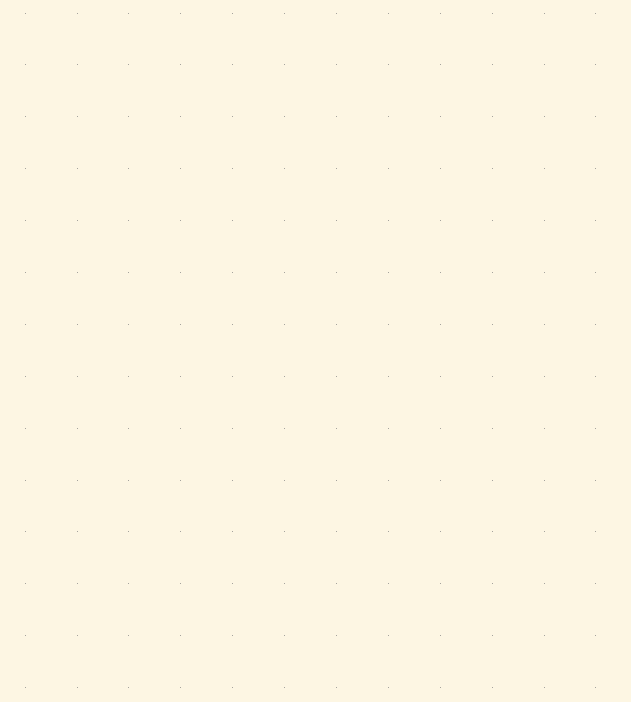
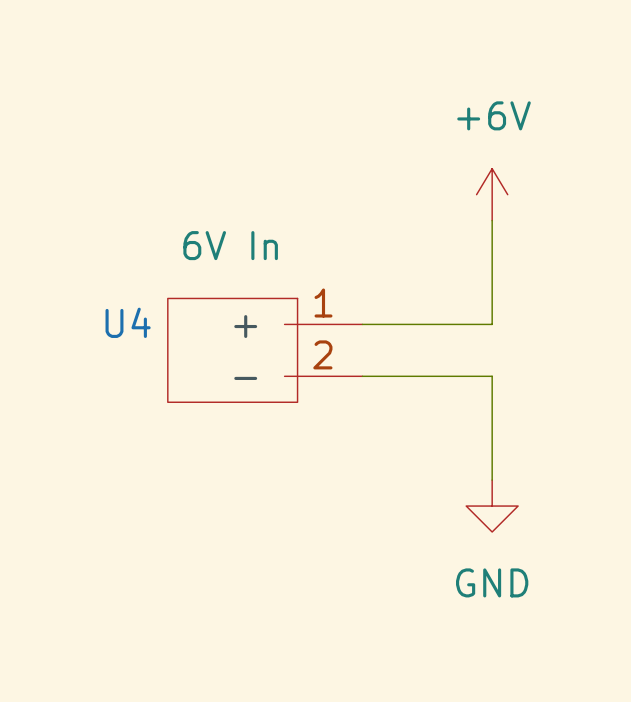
power symbol: none -> +6V (492, 194)
wire: none -> (492, 220) (492, 324) (362, 324)
U4: none -> 6V In (265, 350)
wire: none -> (362, 376) (492, 376) (492, 480)
power symbol: none -> GND (492, 506)

